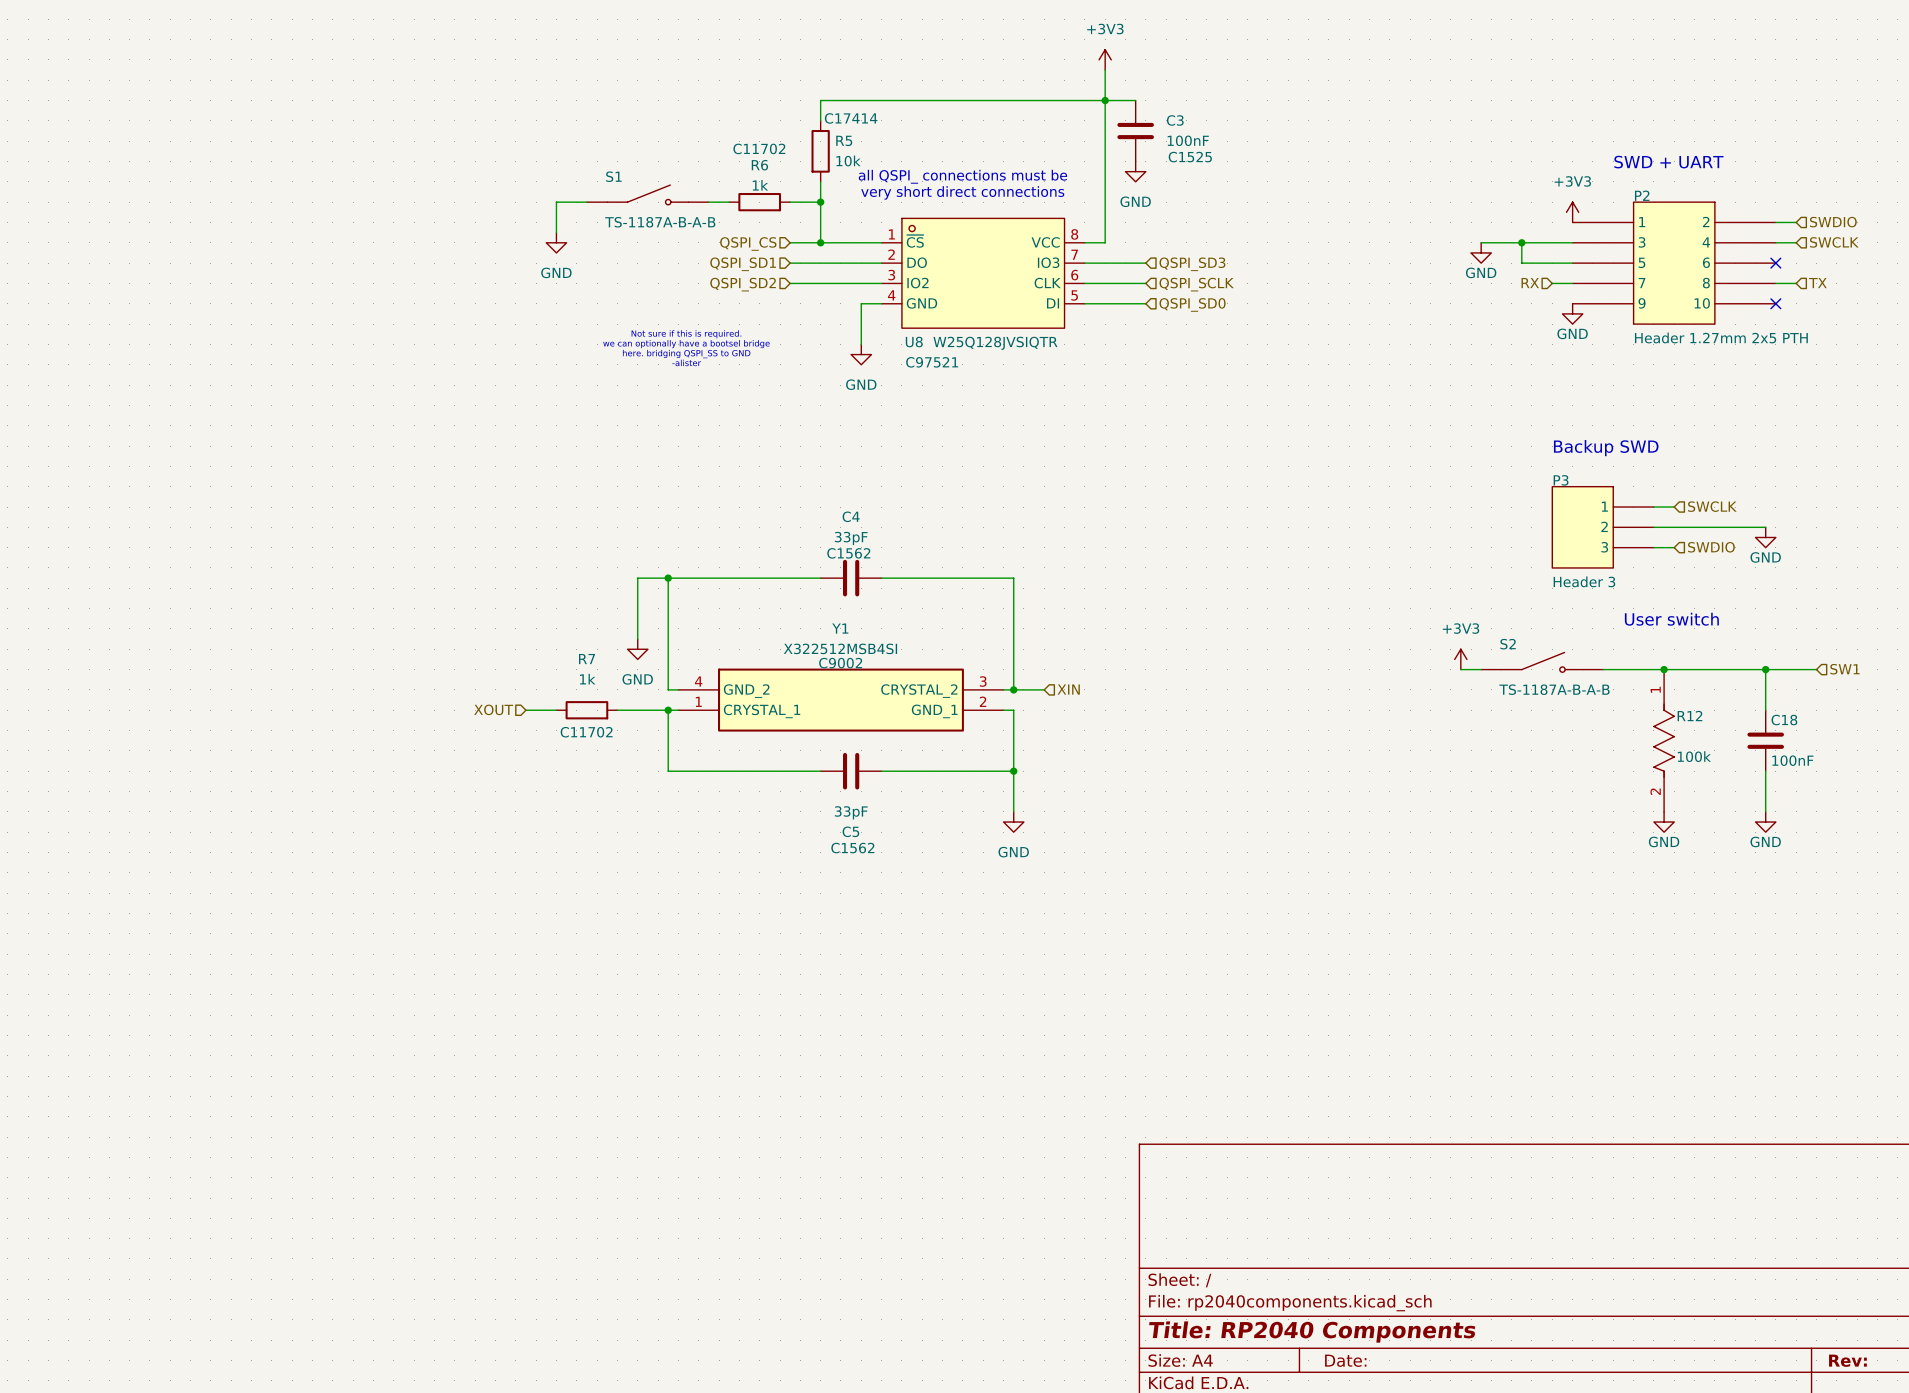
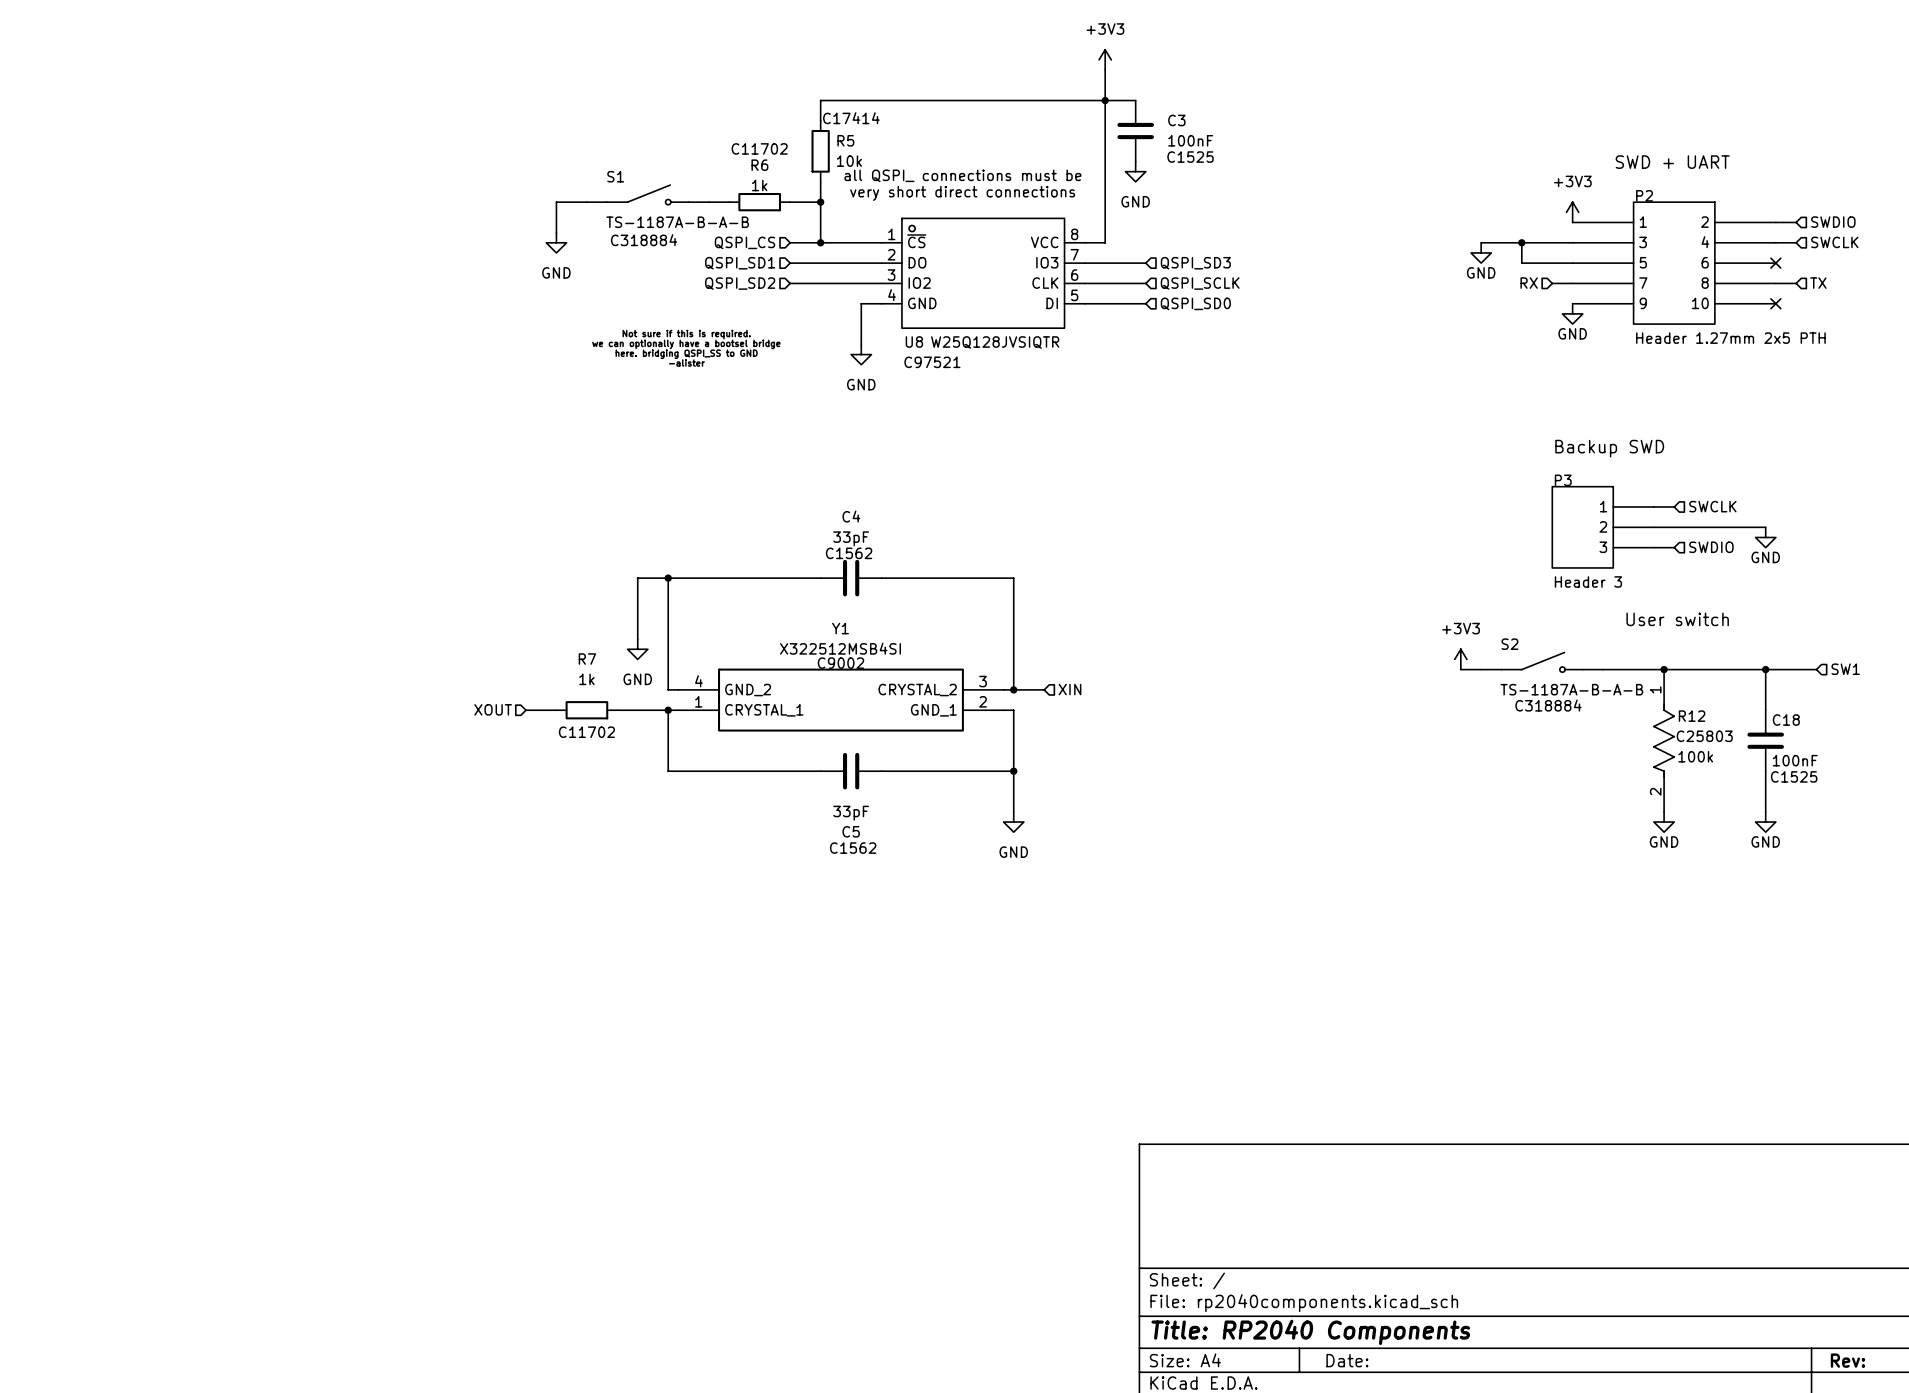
S1 text: none -> C318884 (644, 240)
S2 text: none -> C318884 (1548, 705)
R12 text: none -> C25803 (1704, 736)
C18 text: none -> C1525 (1794, 776)

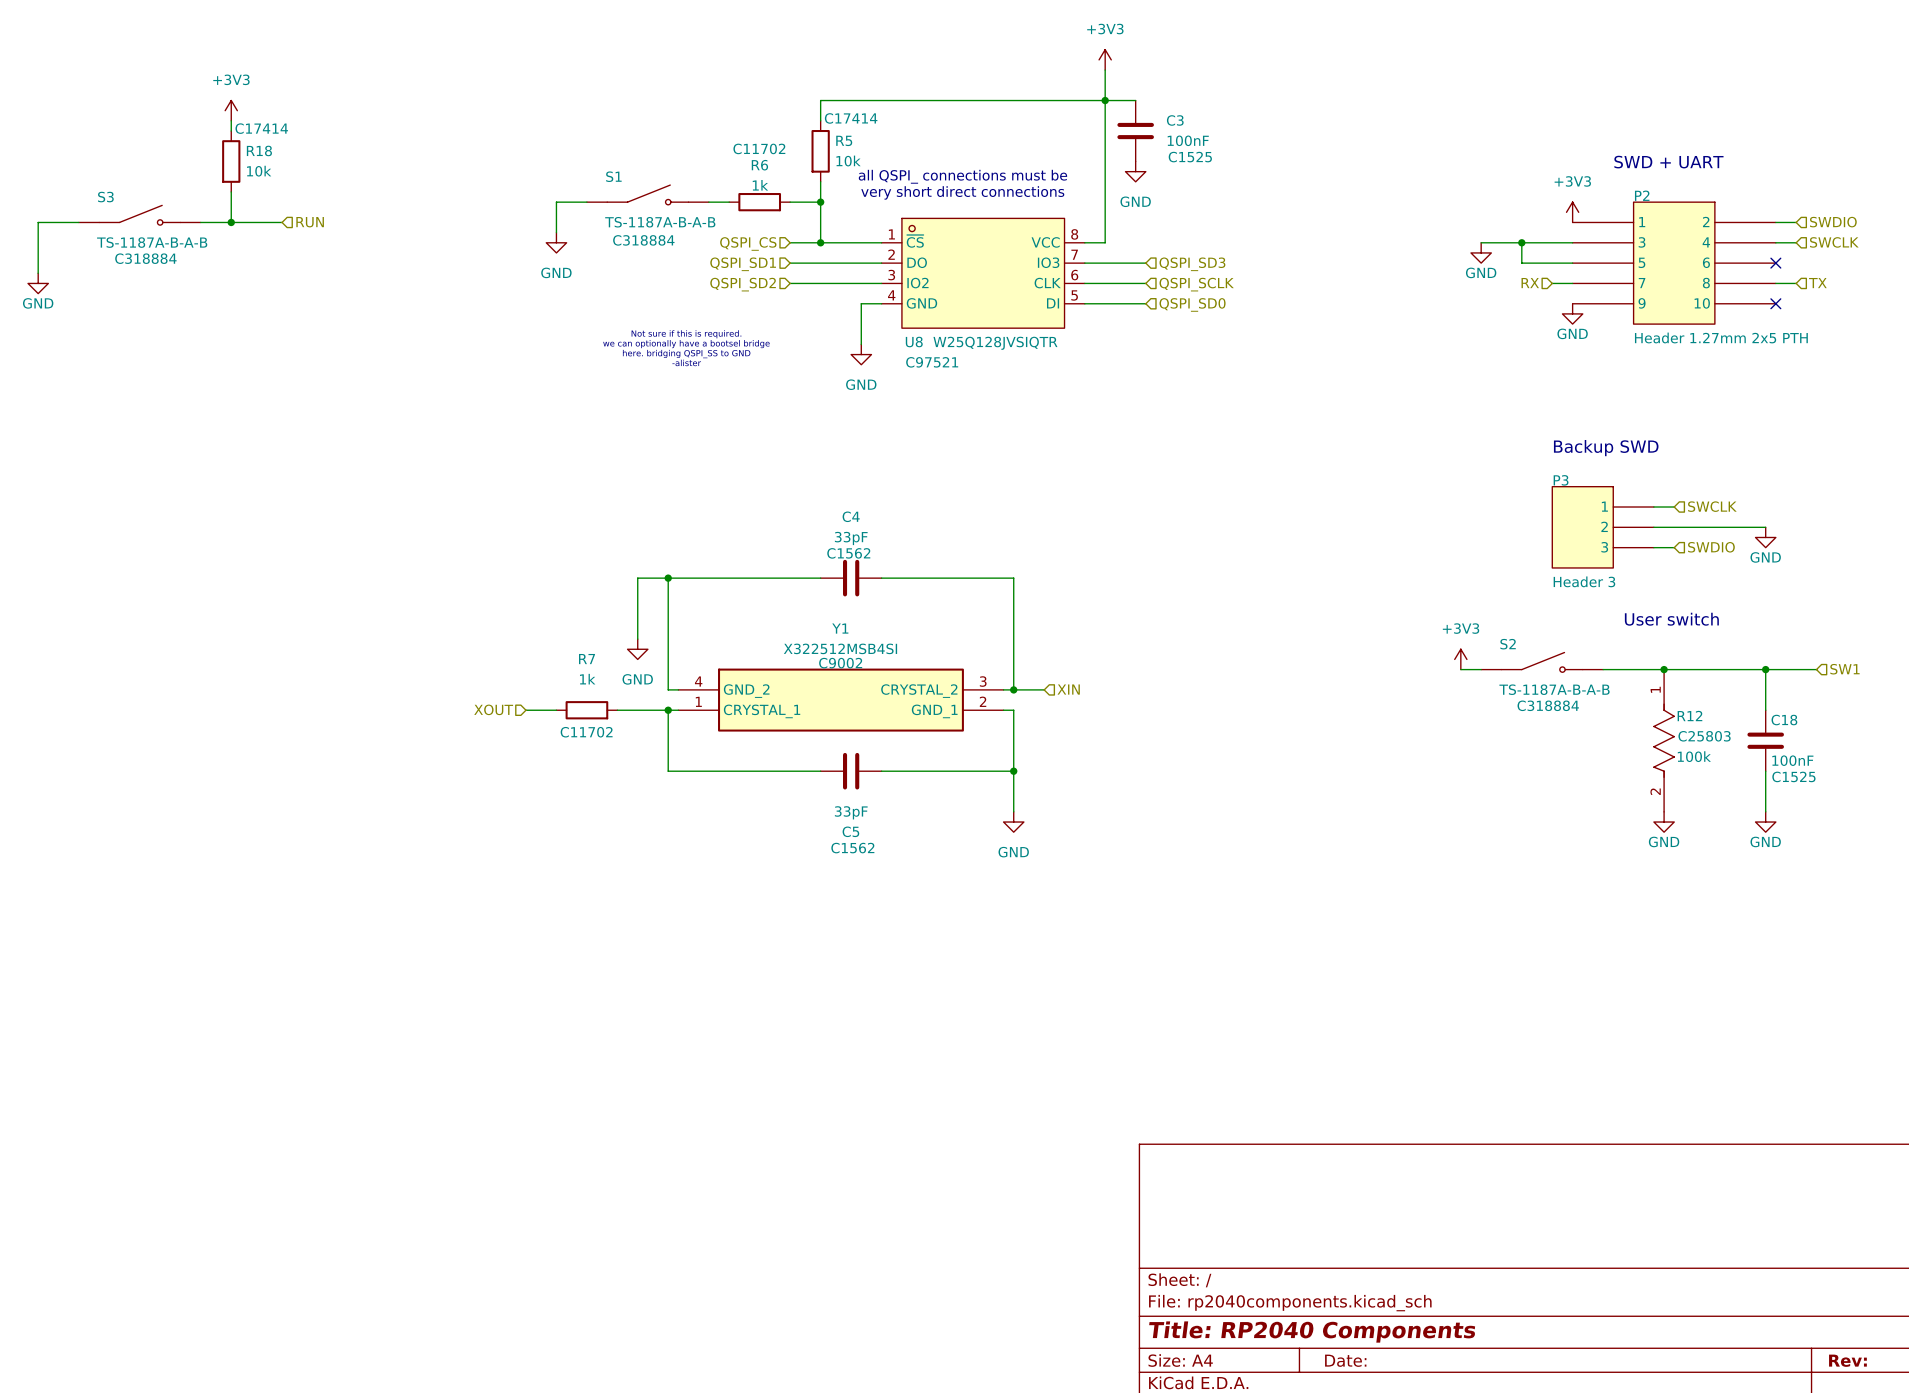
power symbol: none -> +3V3 (231, 110)
wire: none -> (231, 120) (231, 131)
R18: none -> 10k (231, 161)
wire: none -> (231, 191) (231, 222)
S3: none -> TS-1187A-B-A-B (139, 215)
wire: none -> (78, 222) (38, 222) (38, 273)
wire: none -> (200, 222) (282, 222)
junction: none -> (231, 222)
hierarchical label: none -> RUN (310, 222)
power symbol: none -> GND (38, 283)

